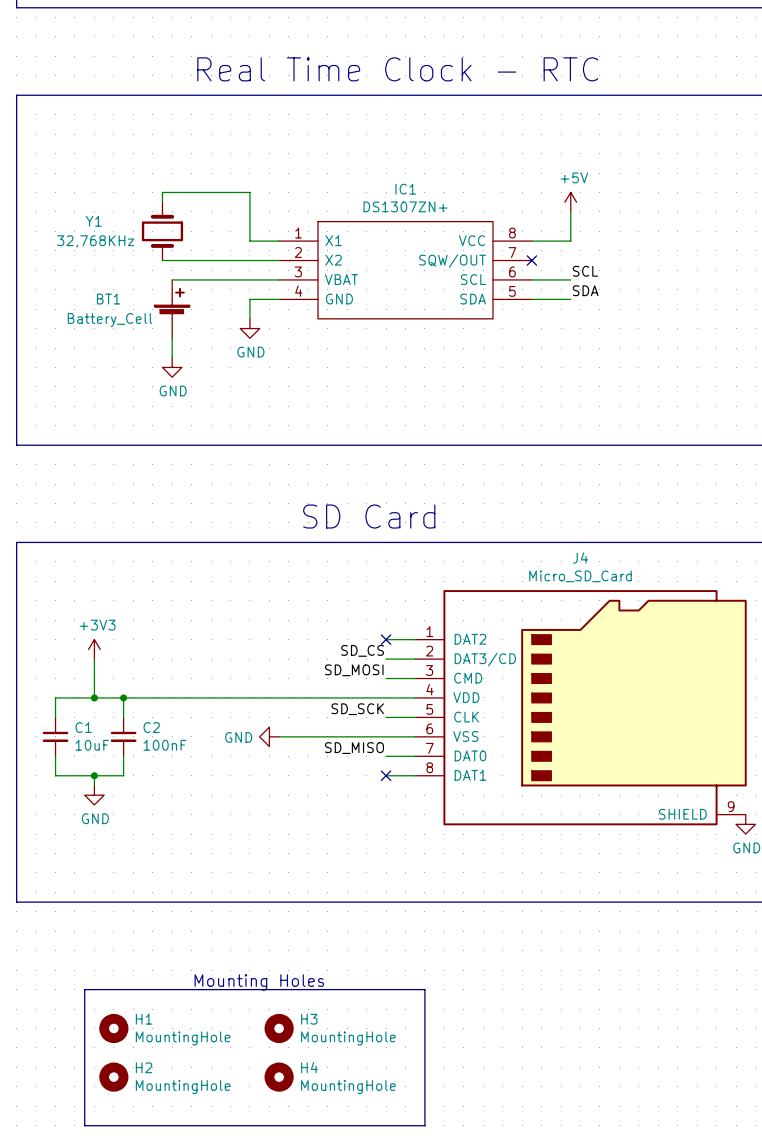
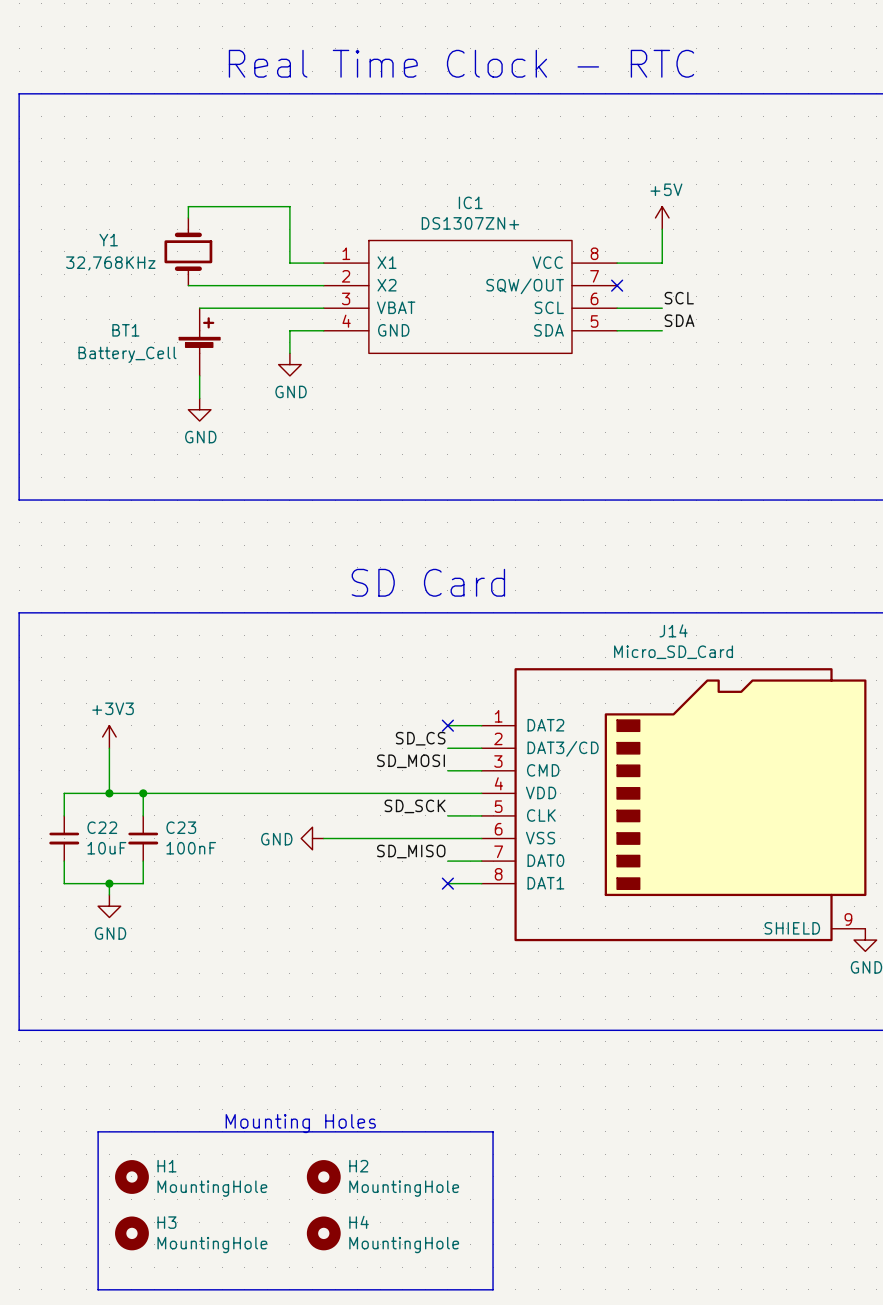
J4 name: J4 (580, 557) -> J14 (673, 630)
C1 name: C1 (83, 727) -> C22 (102, 827)
C2 name: C2 (151, 727) -> C23 (181, 827)
H3 name: H3 (309, 1019) -> H2 (358, 1166)
H2 name: H2 (144, 1067) -> H3 (166, 1222)

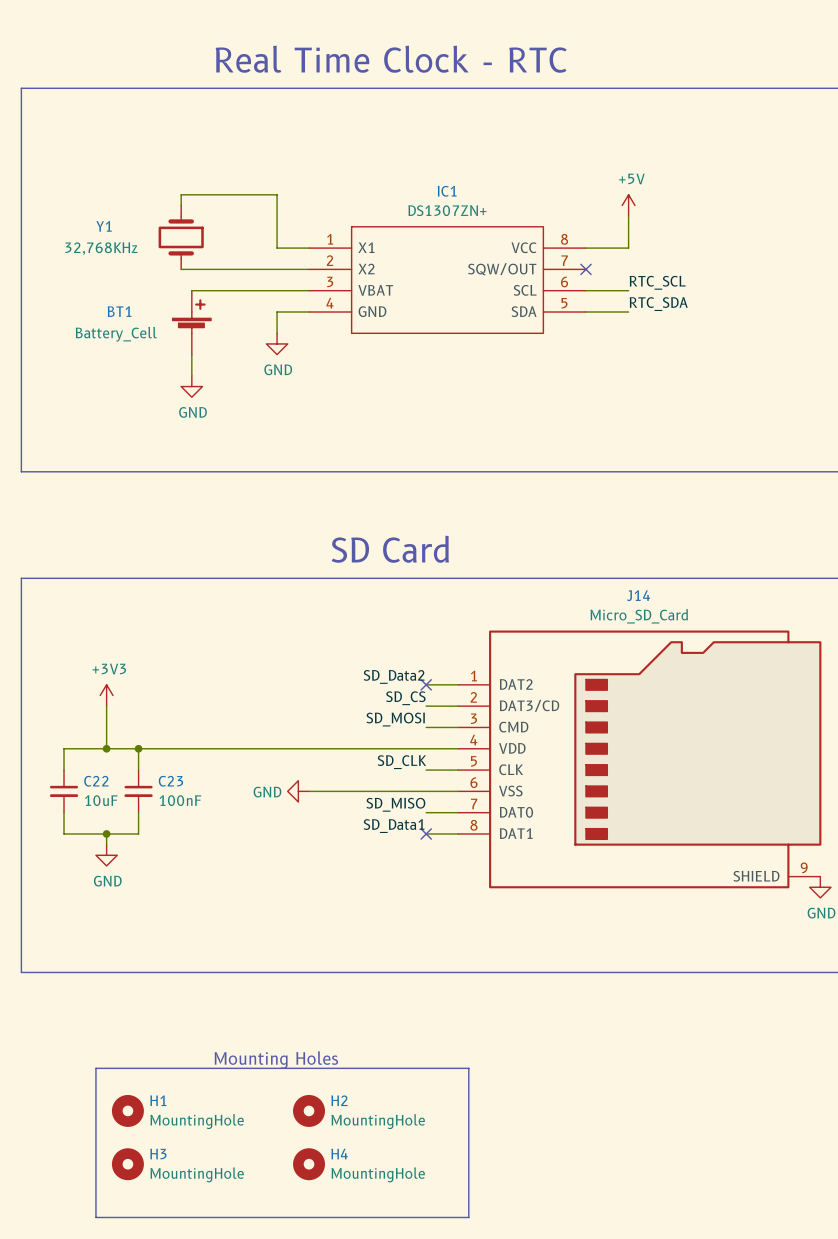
label: SCL (679, 298) -> RTC_SCL (657, 282)
label: SDA (679, 320) -> RTC_SDA (658, 304)
label: none -> SD_Data2 (394, 676)
label: SD_SCK (415, 806) -> SD_CLK (401, 762)
label: none -> SD_Data1 (394, 826)

